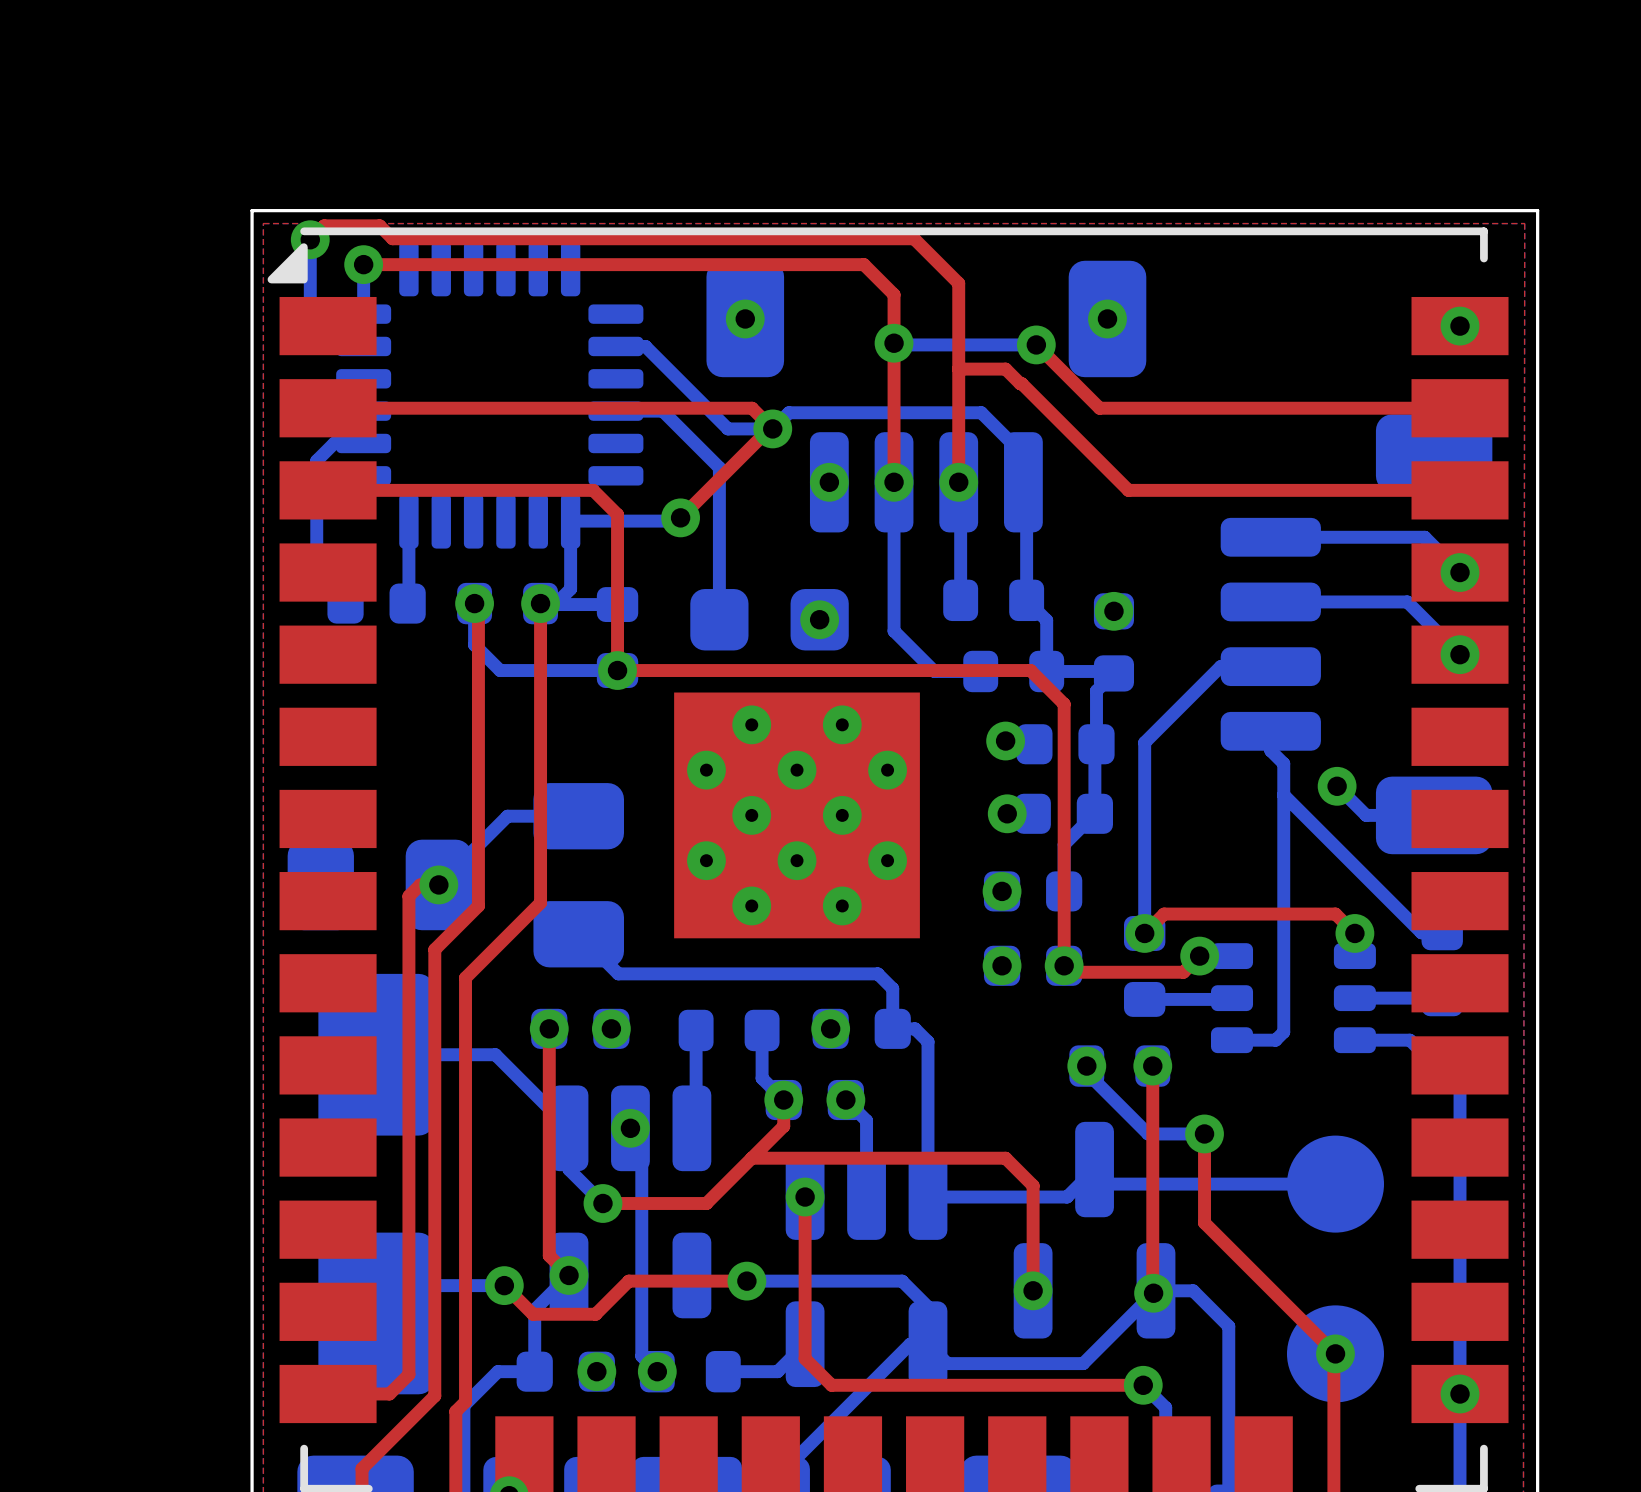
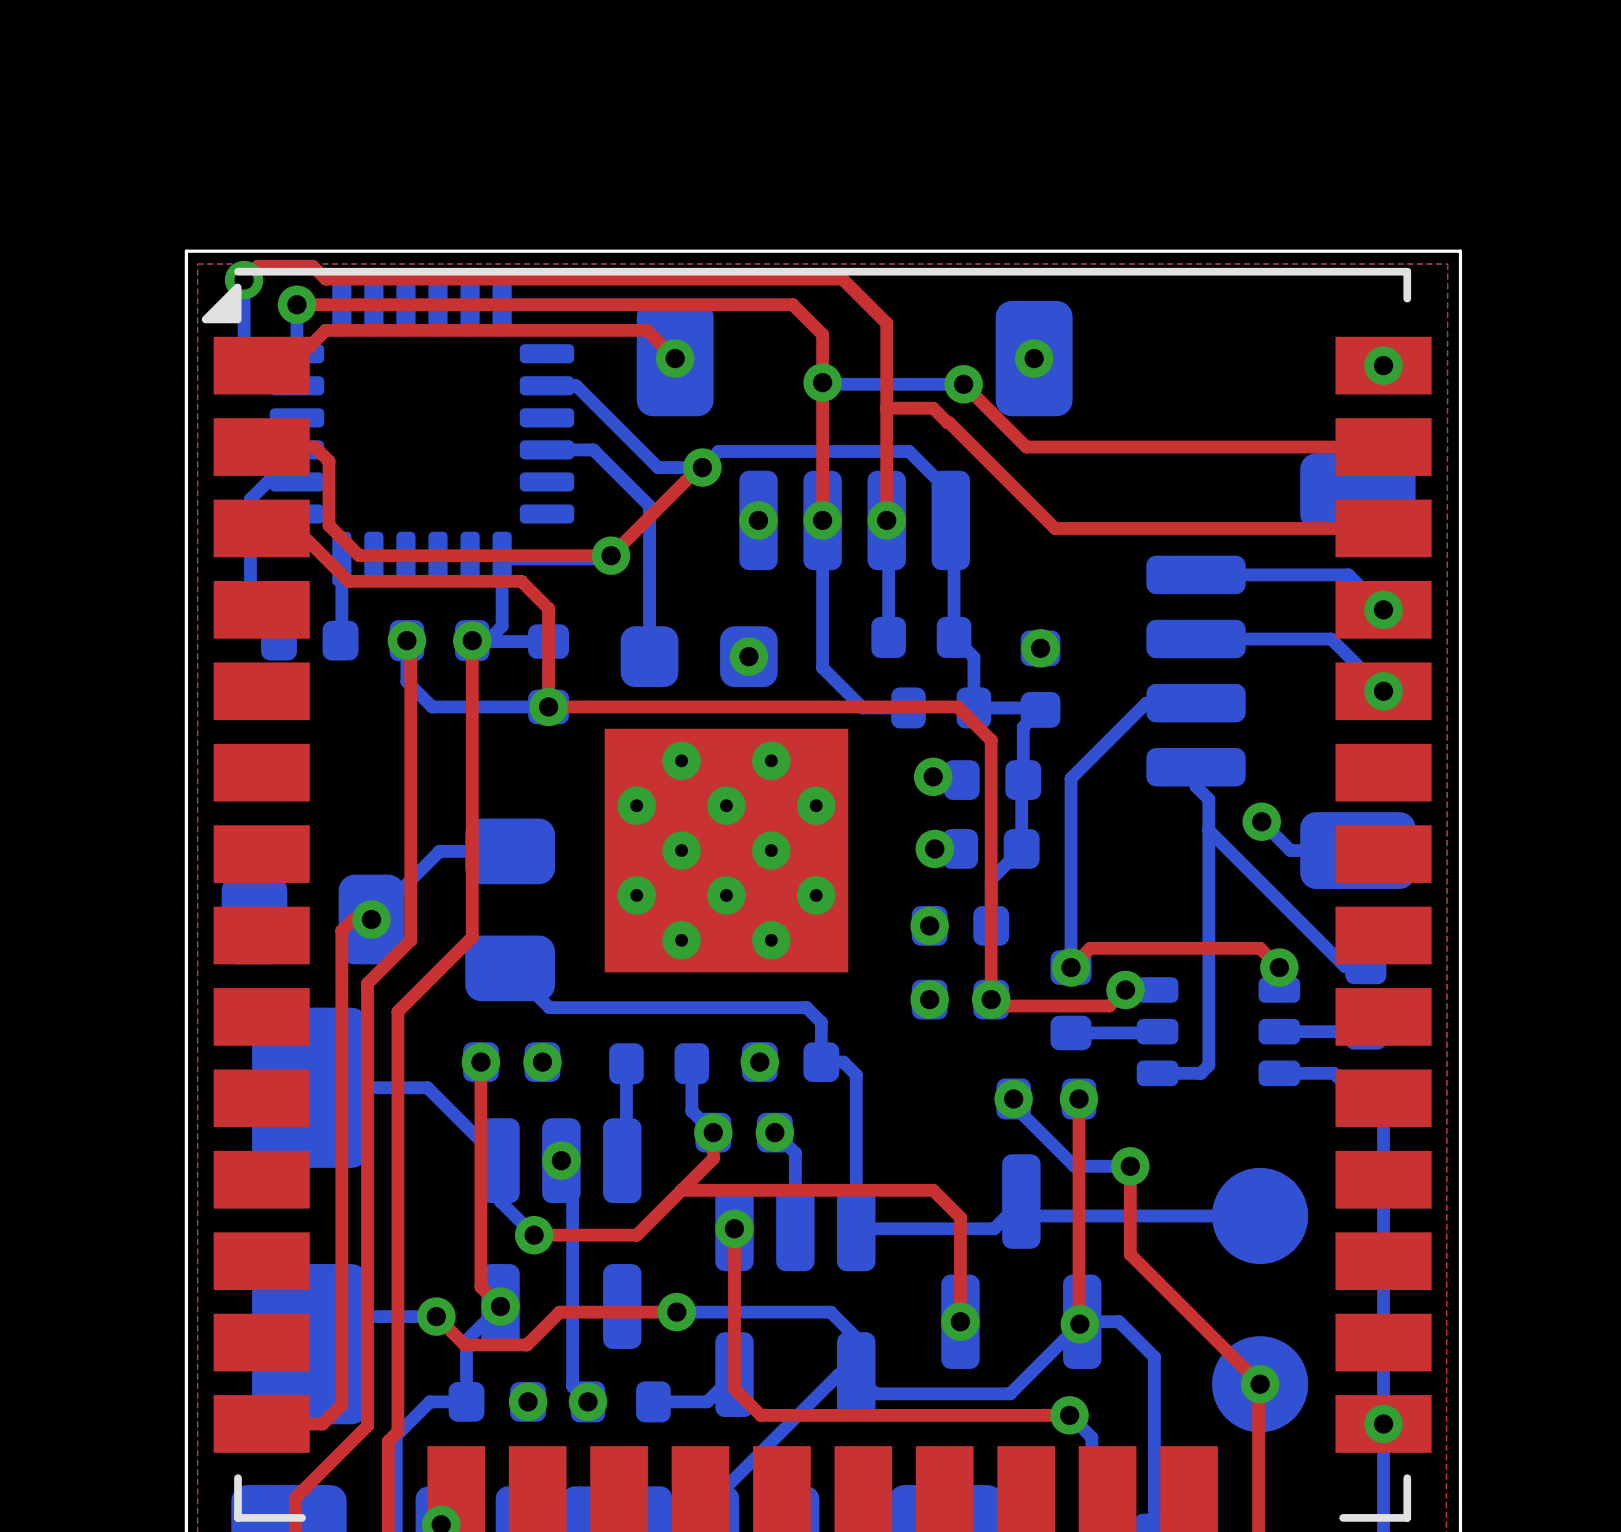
top track: none -> (675, 358) (646, 330) (325, 330) (290, 365) (261, 365)
top track: (381, 408) (752, 408) (772, 428) -> (314, 447) (329, 461) (329, 525) (359, 555) (611, 555)
top track: (362, 490) (593, 490) (617, 514) (617, 571) -> (295, 528) (348, 581) (521, 581) (548, 608)

